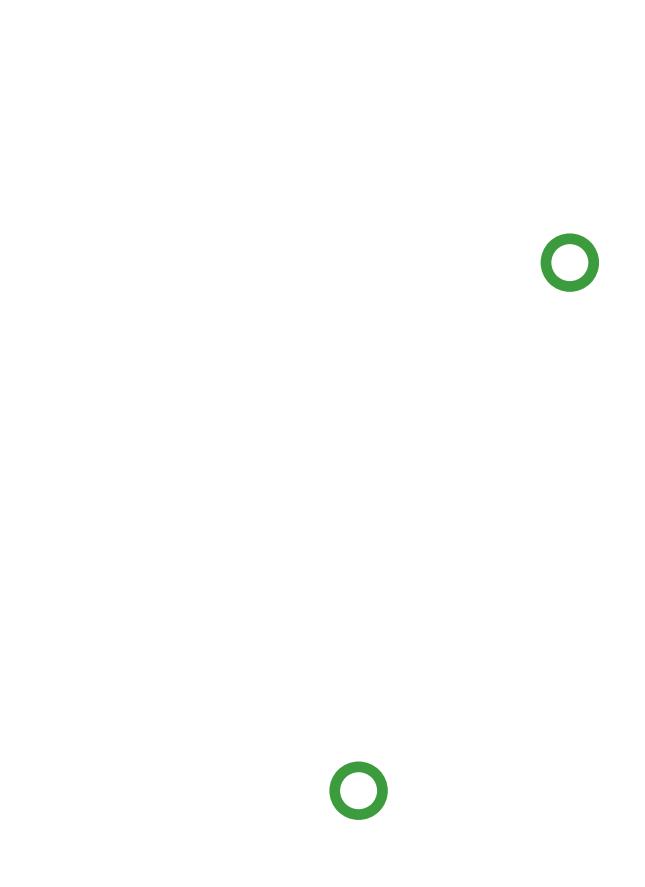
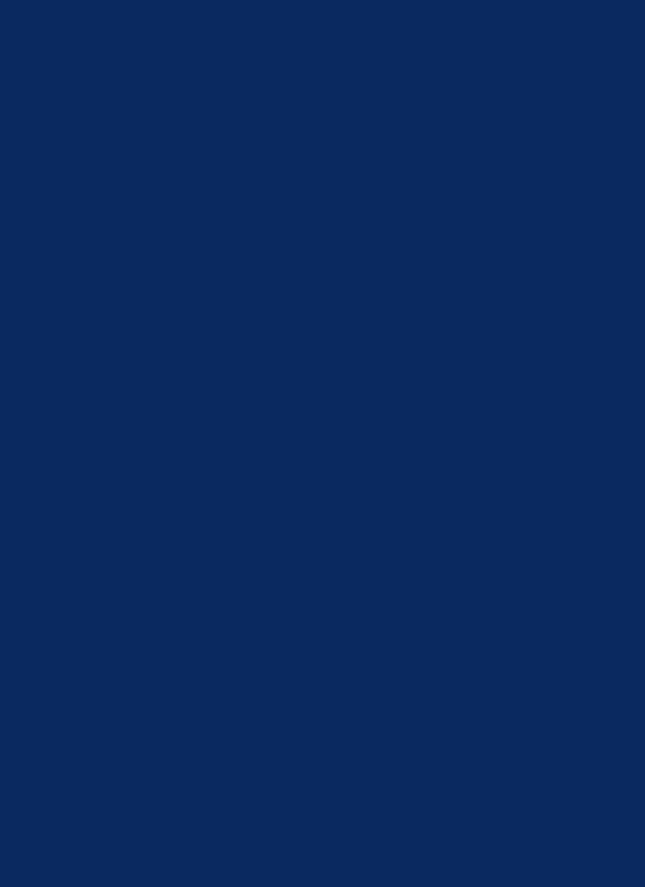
via: (569, 262) -> none
via: (358, 790) -> none

